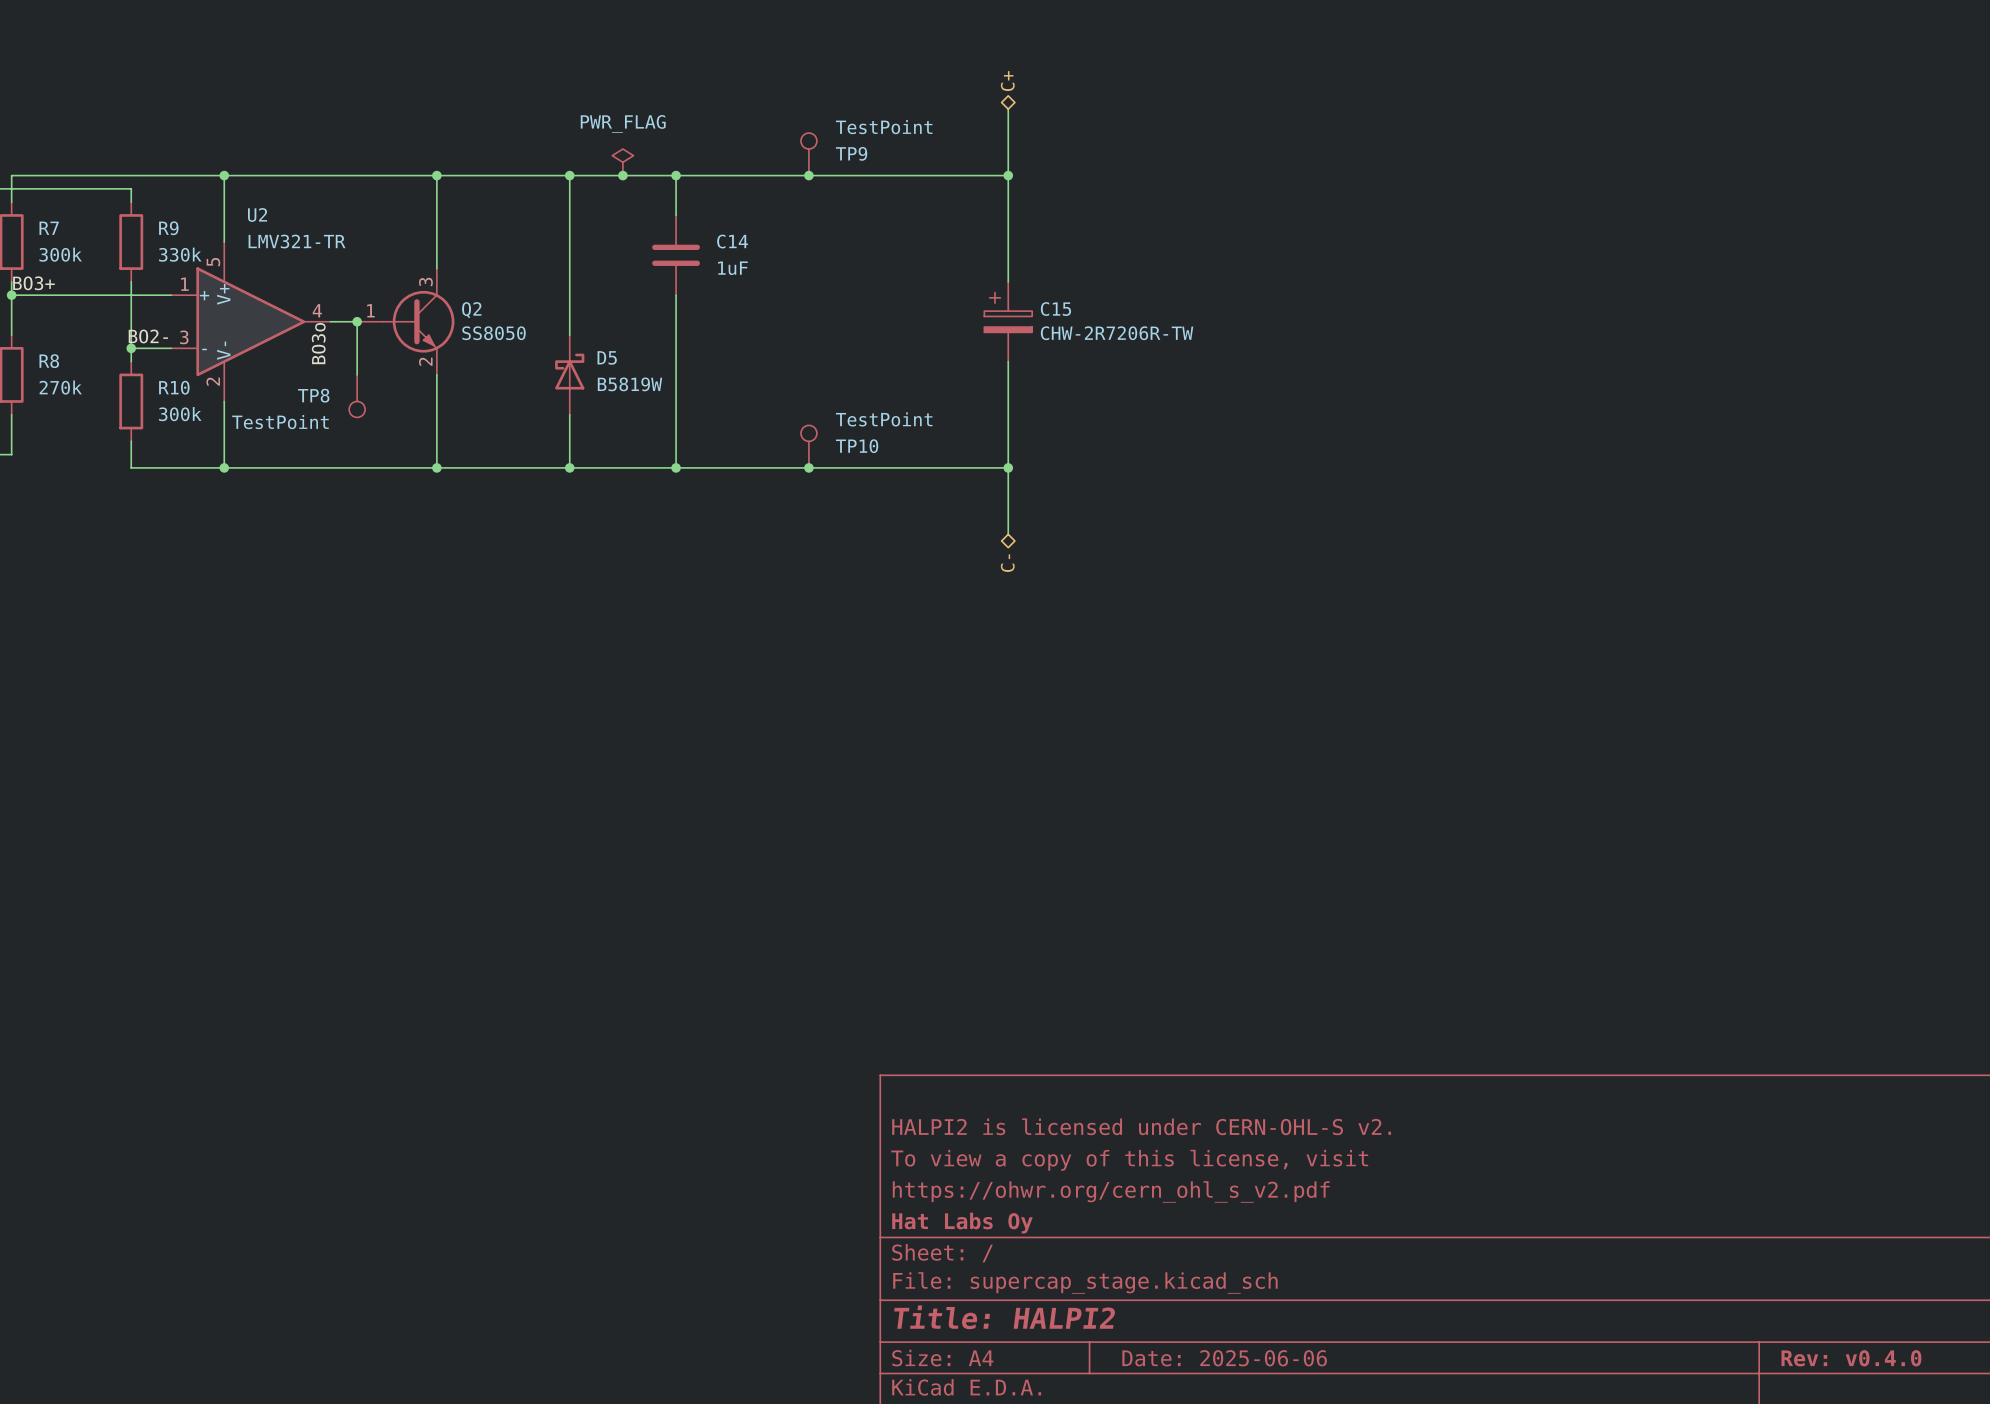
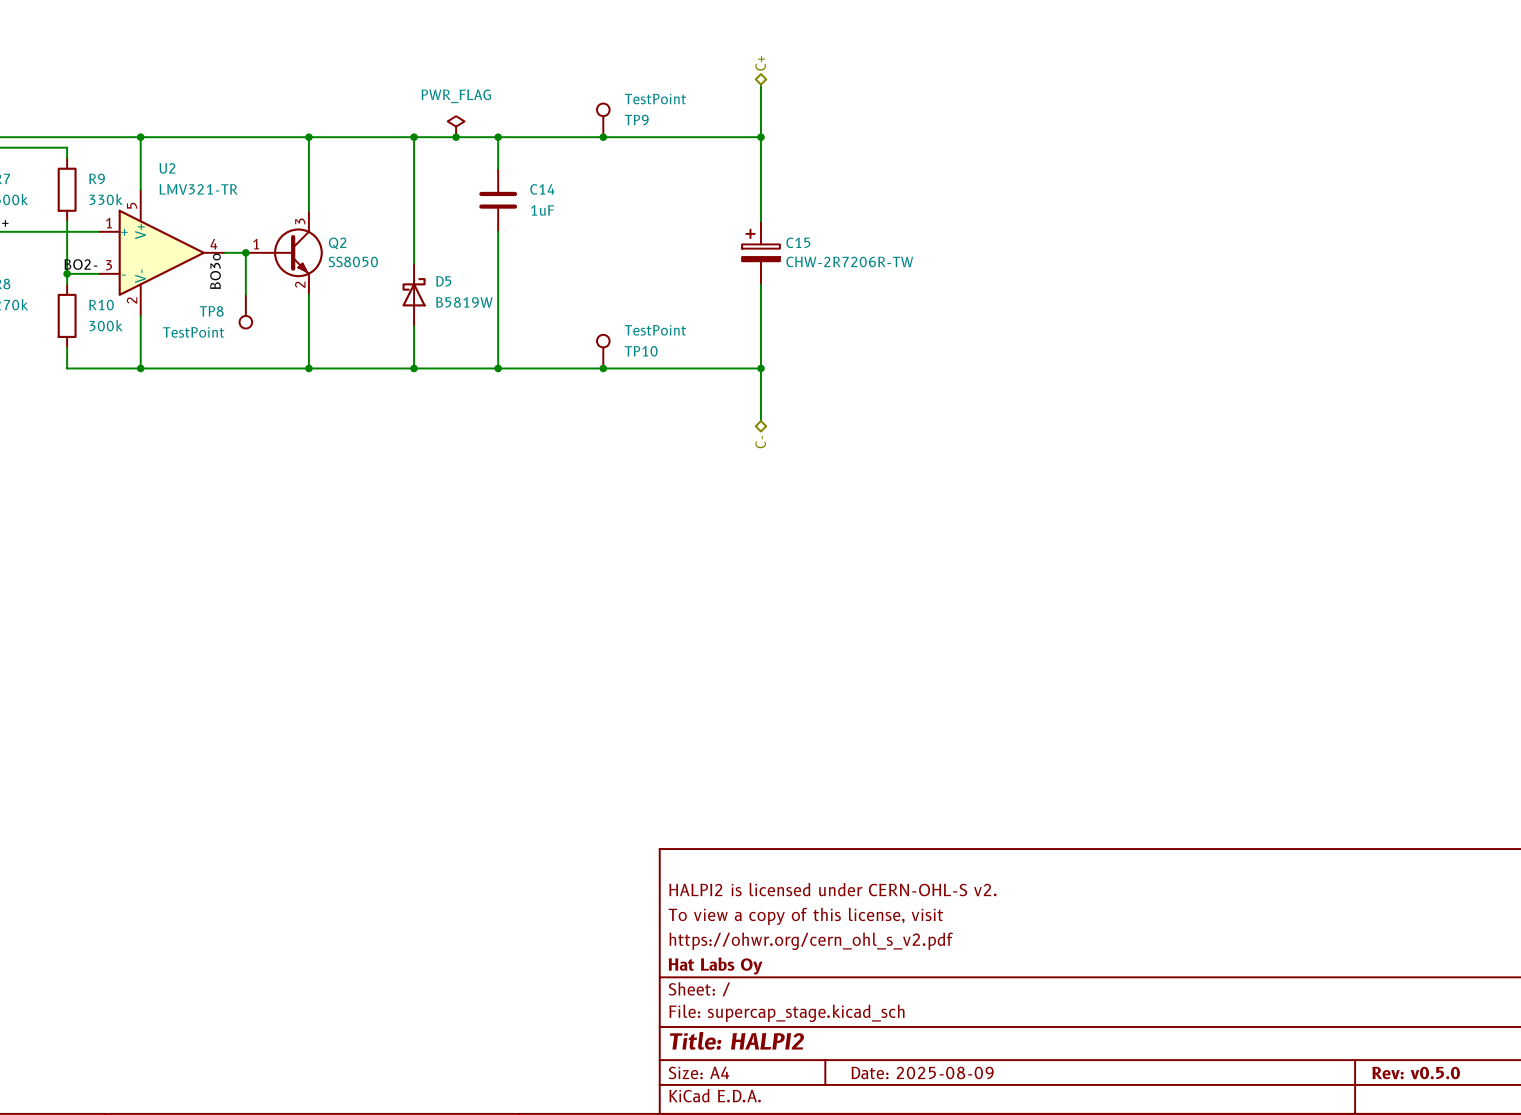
title block: Date: 2025-06-06 (1224, 1358) -> Date: 2025-08-09 (922, 1072)
title block: Rev: v0.4.0 (1851, 1358) -> Rev: v0.5.0 (1416, 1073)

